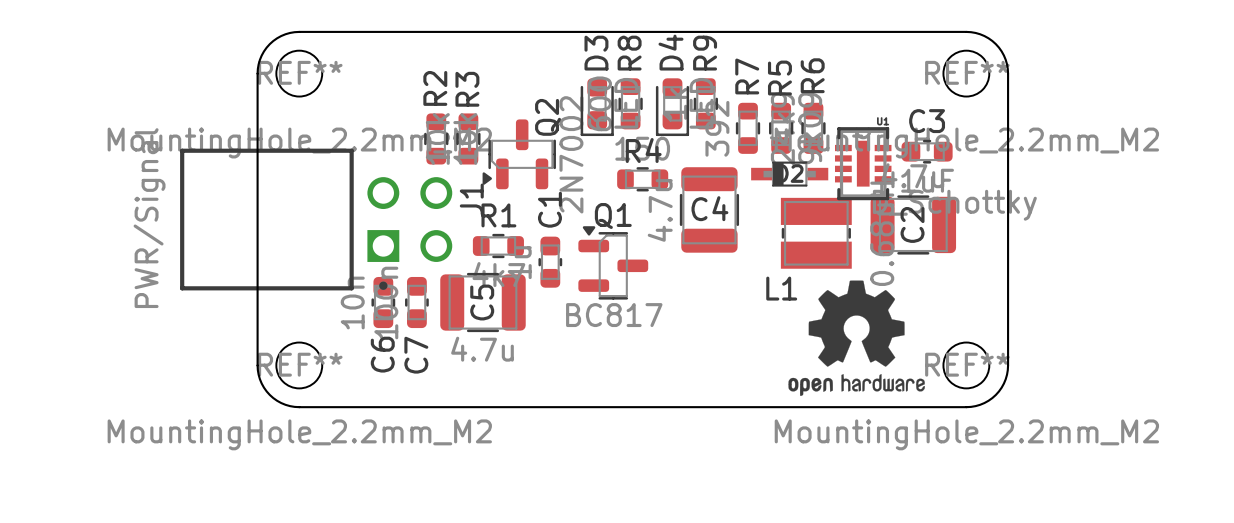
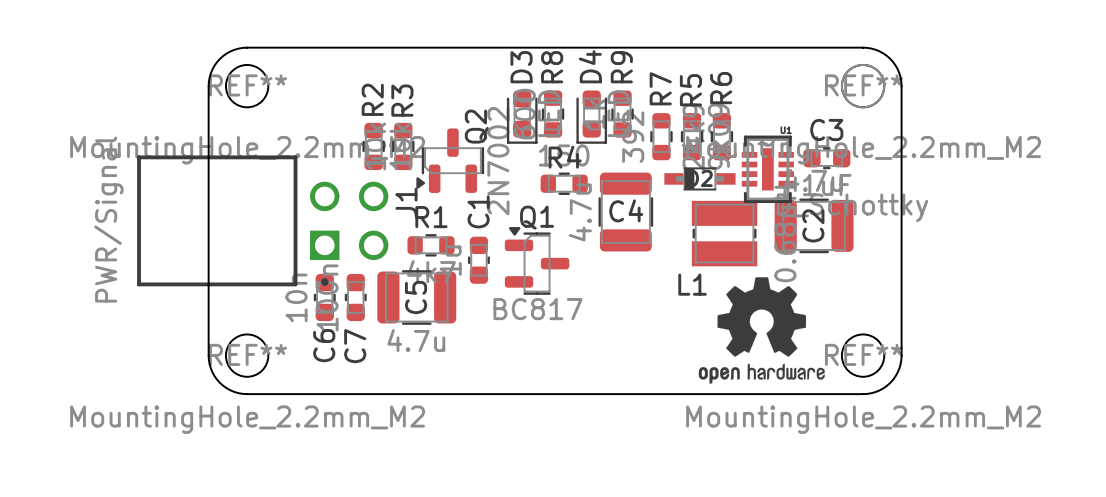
REF** footprint: [943, 50, 990, 97] -> [840, 64, 886, 109]

